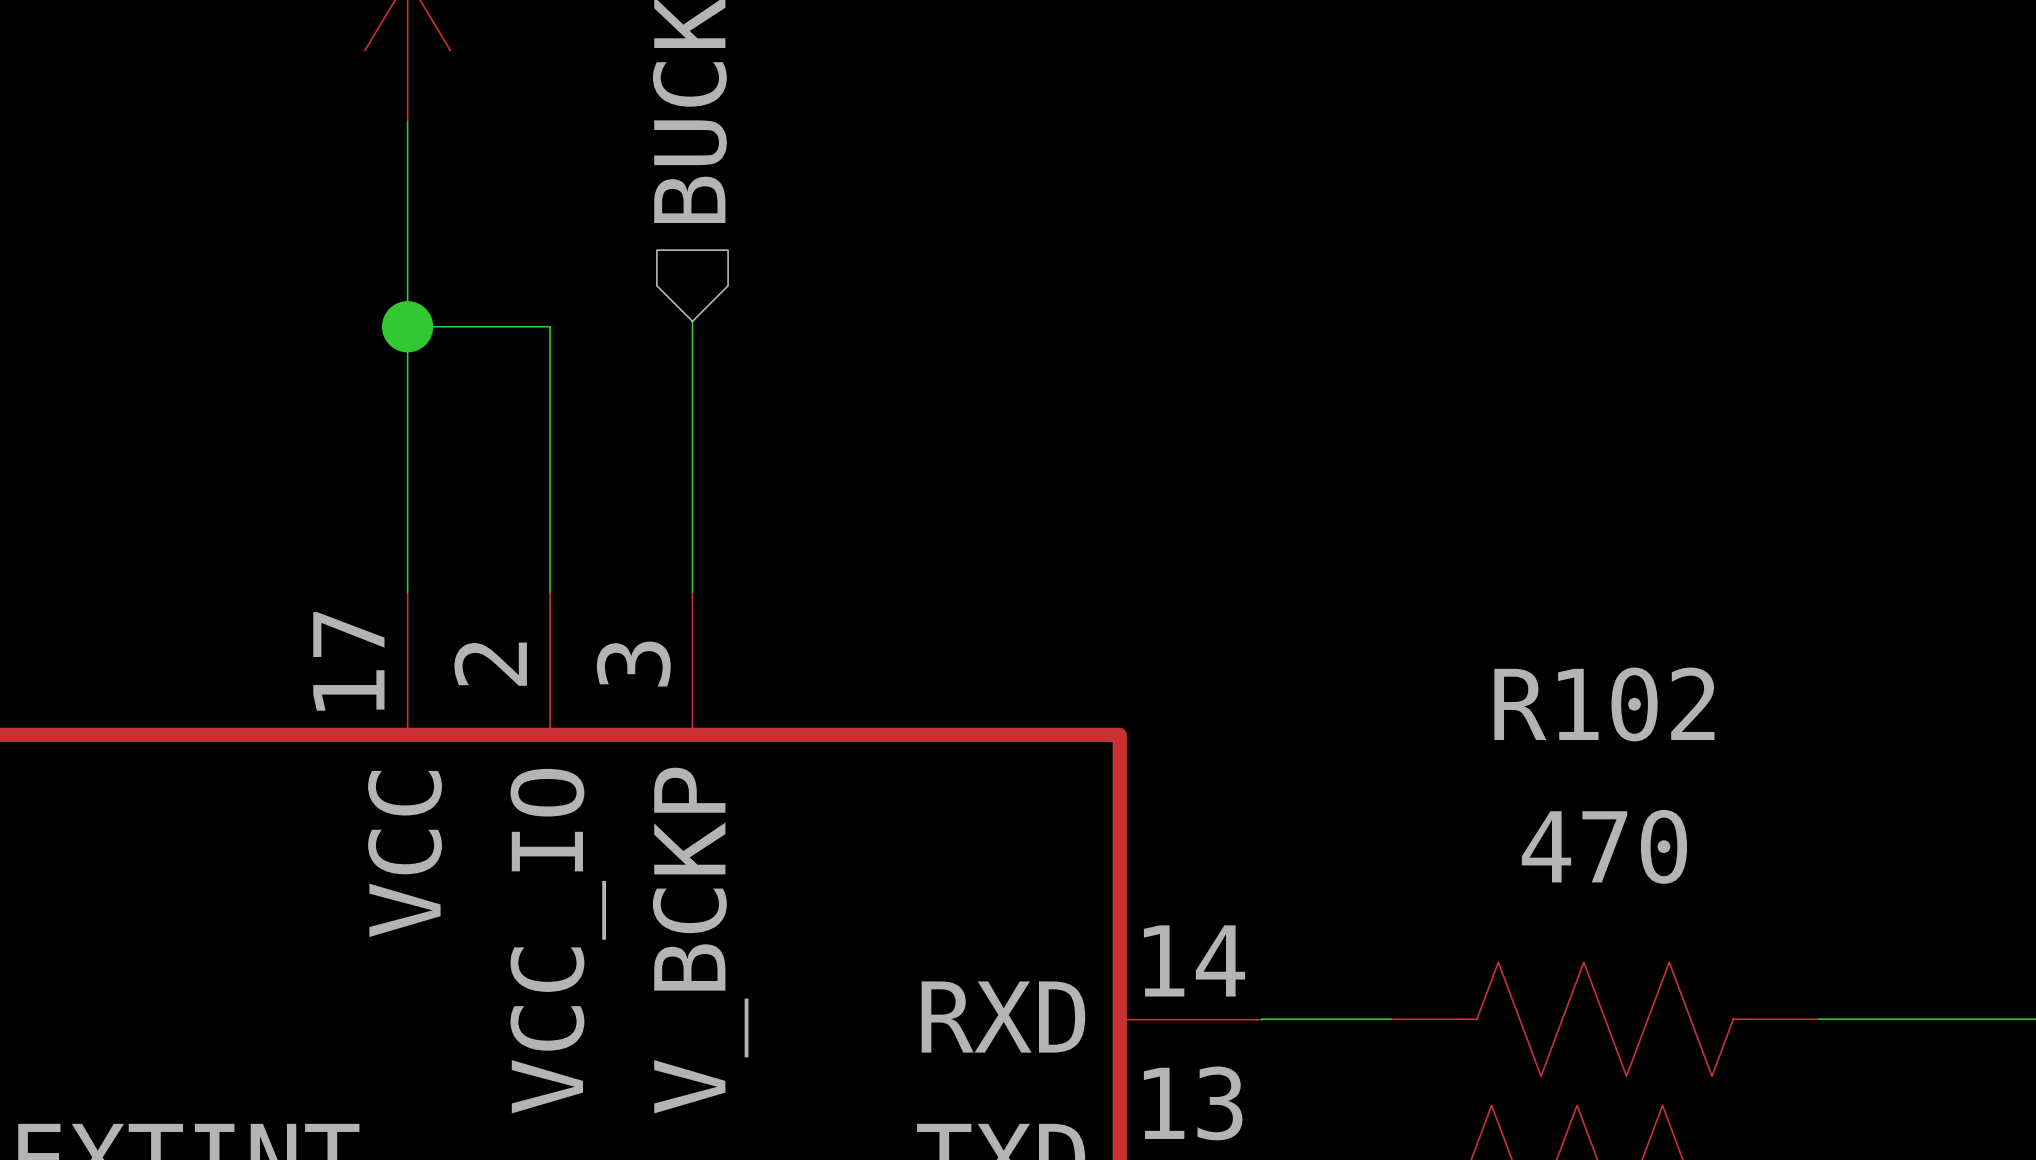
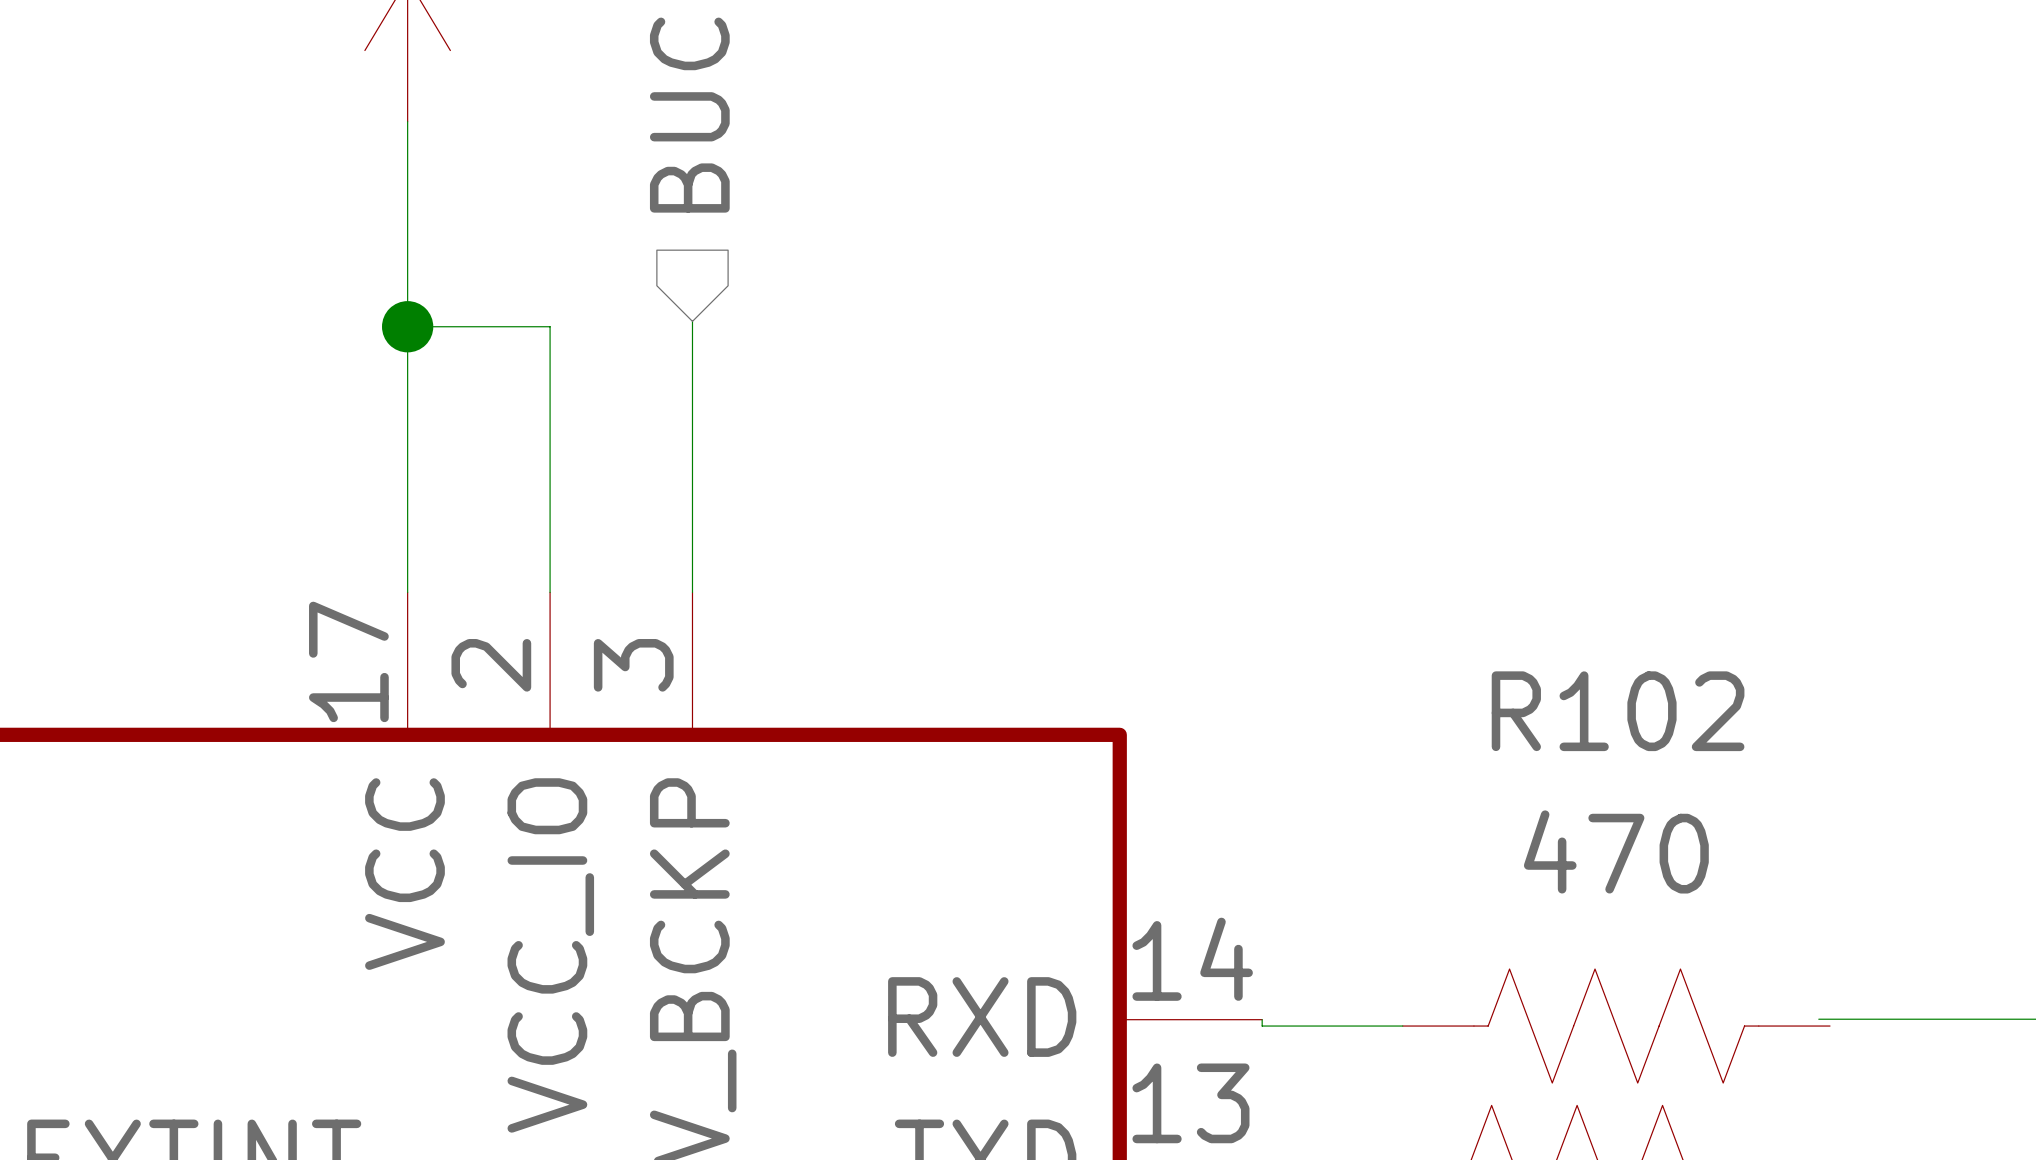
wire: (1262, 1019) (1391, 1019) -> (1262, 1019) (1262, 1026) (1402, 1026)
R102 position: (1605, 1019) -> (1616, 1026)

